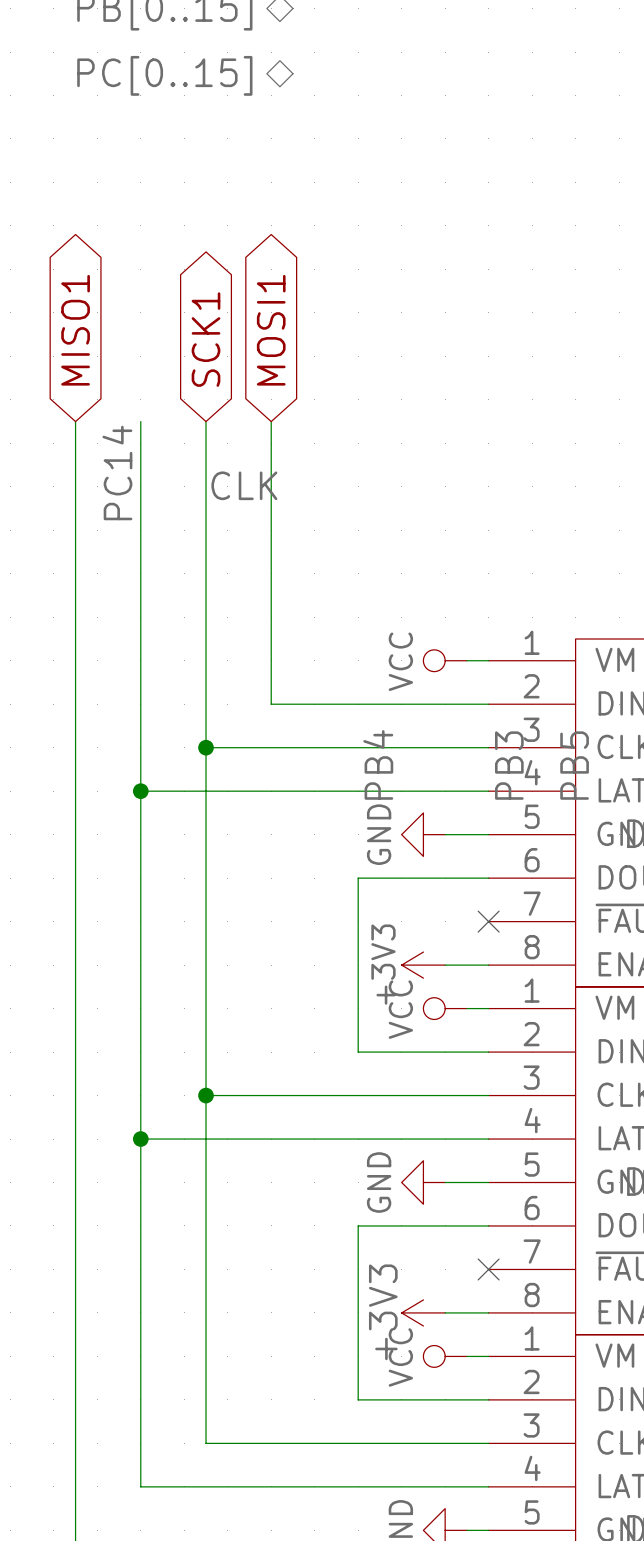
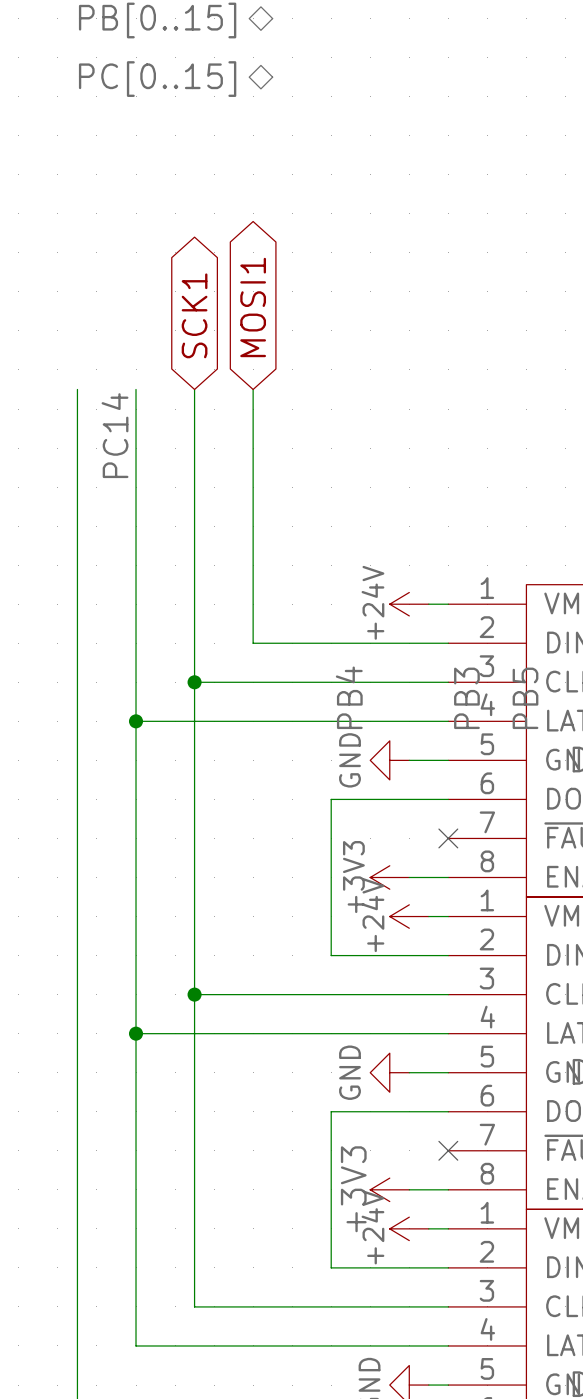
global label: MISO1 (75, 330) -> none
label: CLK (244, 485) -> none
power symbol: VCC (445, 660) -> +24V (409, 604)
power symbol: VCC (445, 1008) -> +24V (409, 916)
power symbol: VCC (445, 1356) -> +24V (409, 1228)

